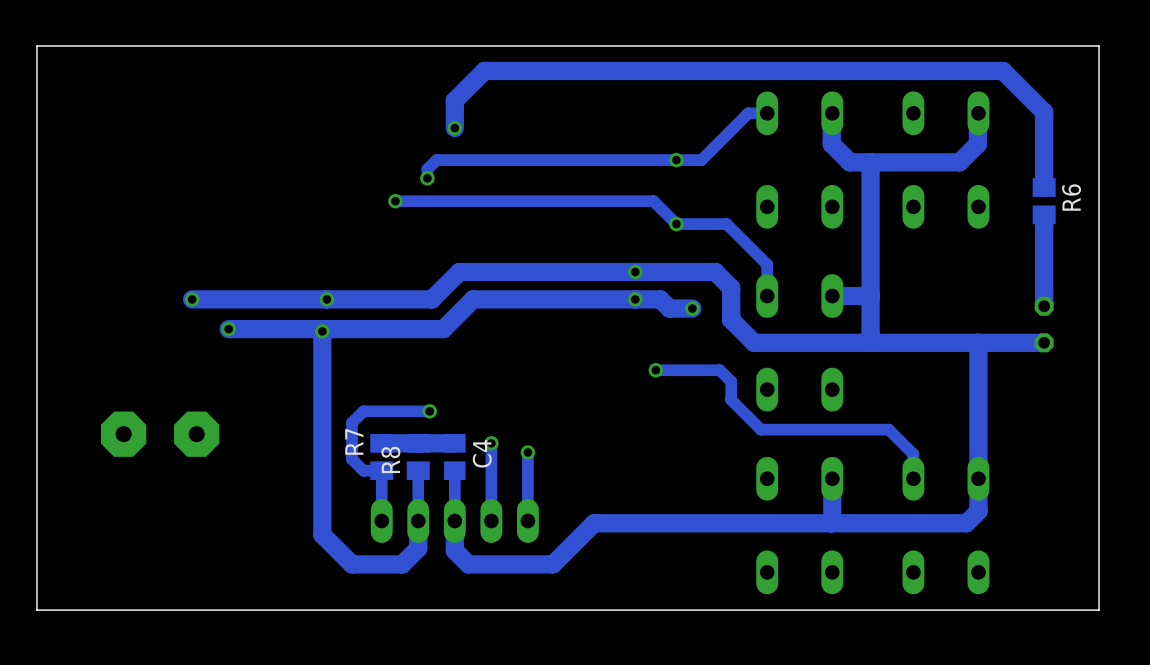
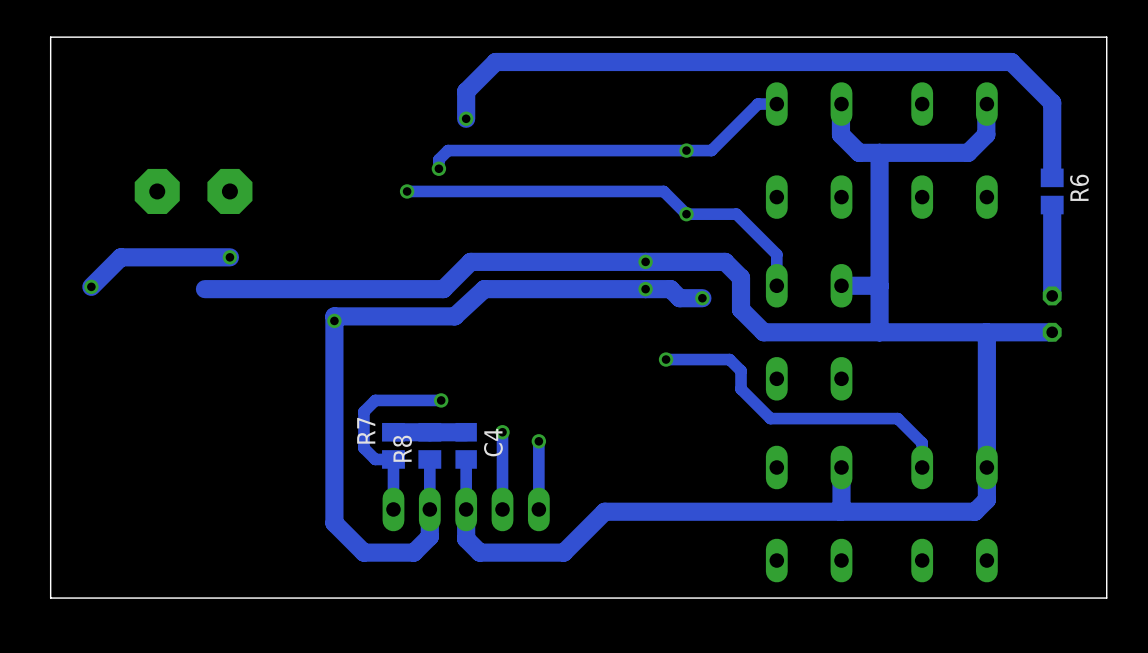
track: none -> (229, 257) (120, 257) (91, 286)
via: none -> (229, 257)
via: none -> (91, 286)
via: (192, 299) -> none
via: (326, 299) -> none
track: (473, 299) (443, 329) (228, 329) -> (484, 289) (454, 316) (334, 316) (334, 318)
via: (228, 329) -> none
part position: (160, 434) -> (193, 191)

